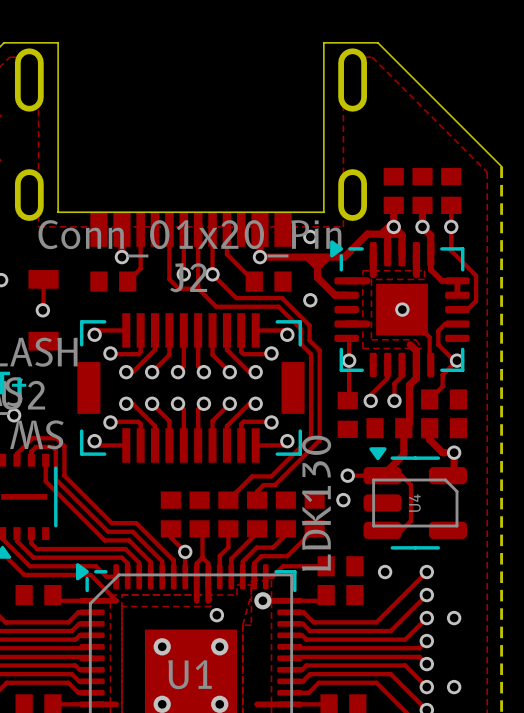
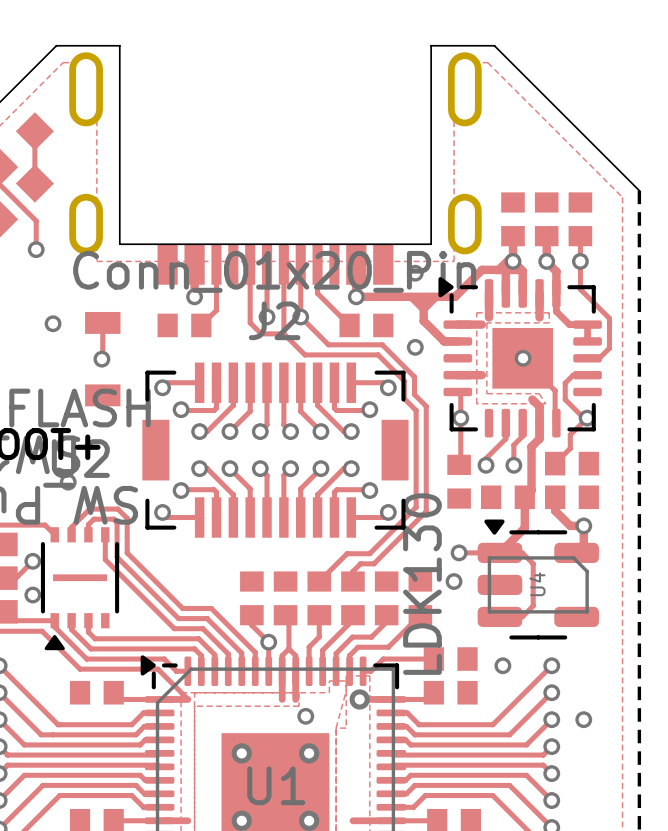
via: (454, 687) -> none

